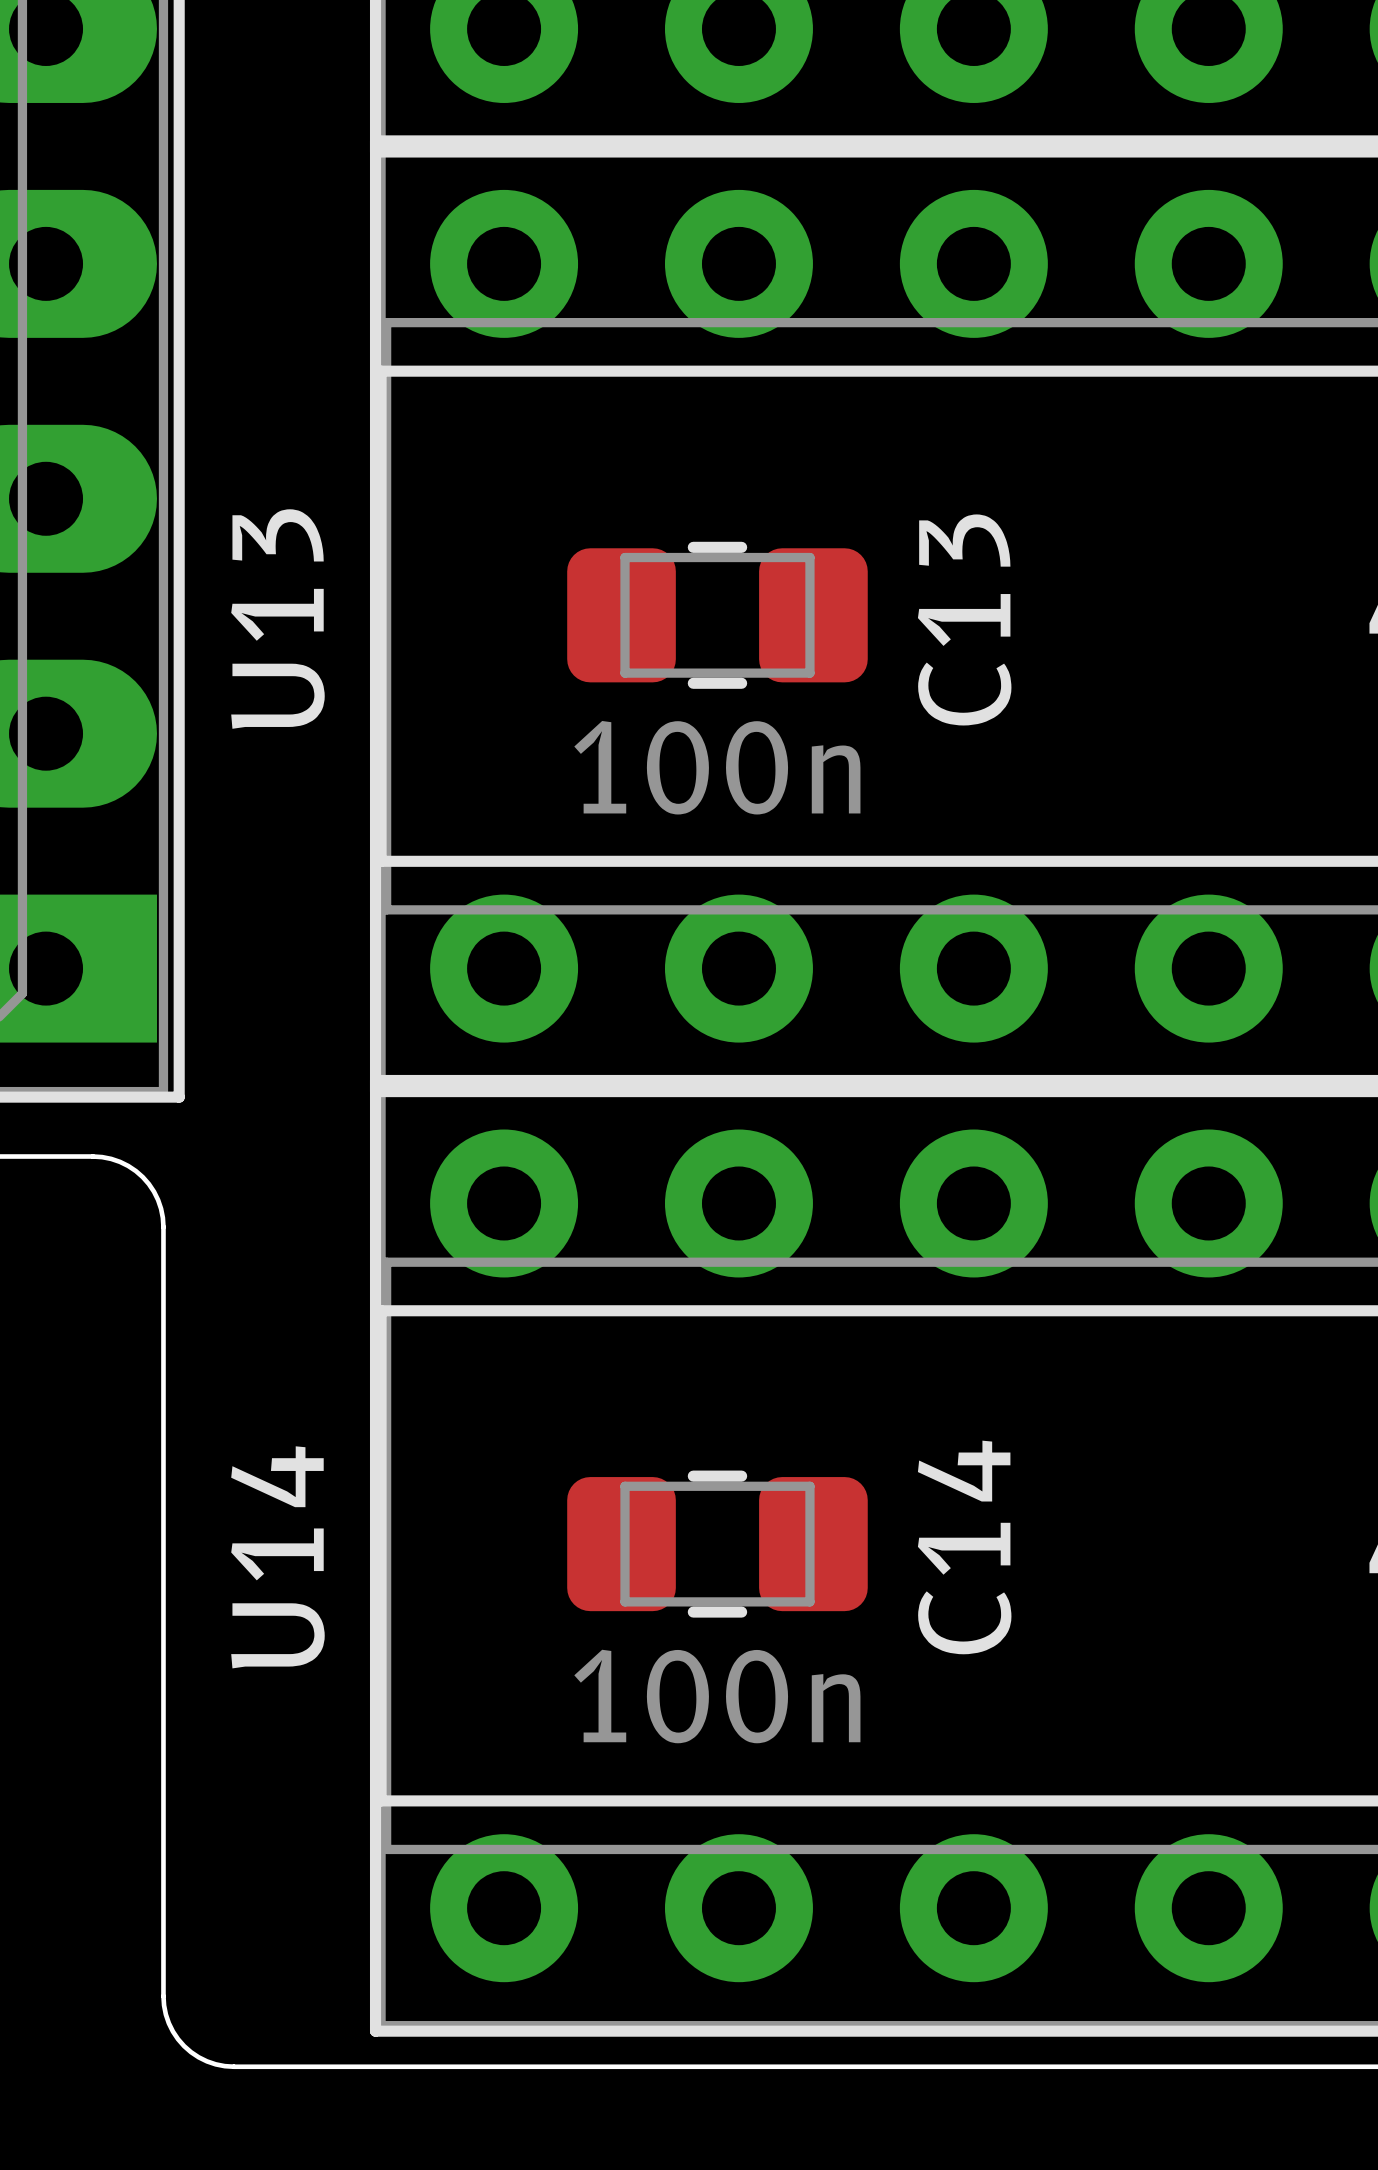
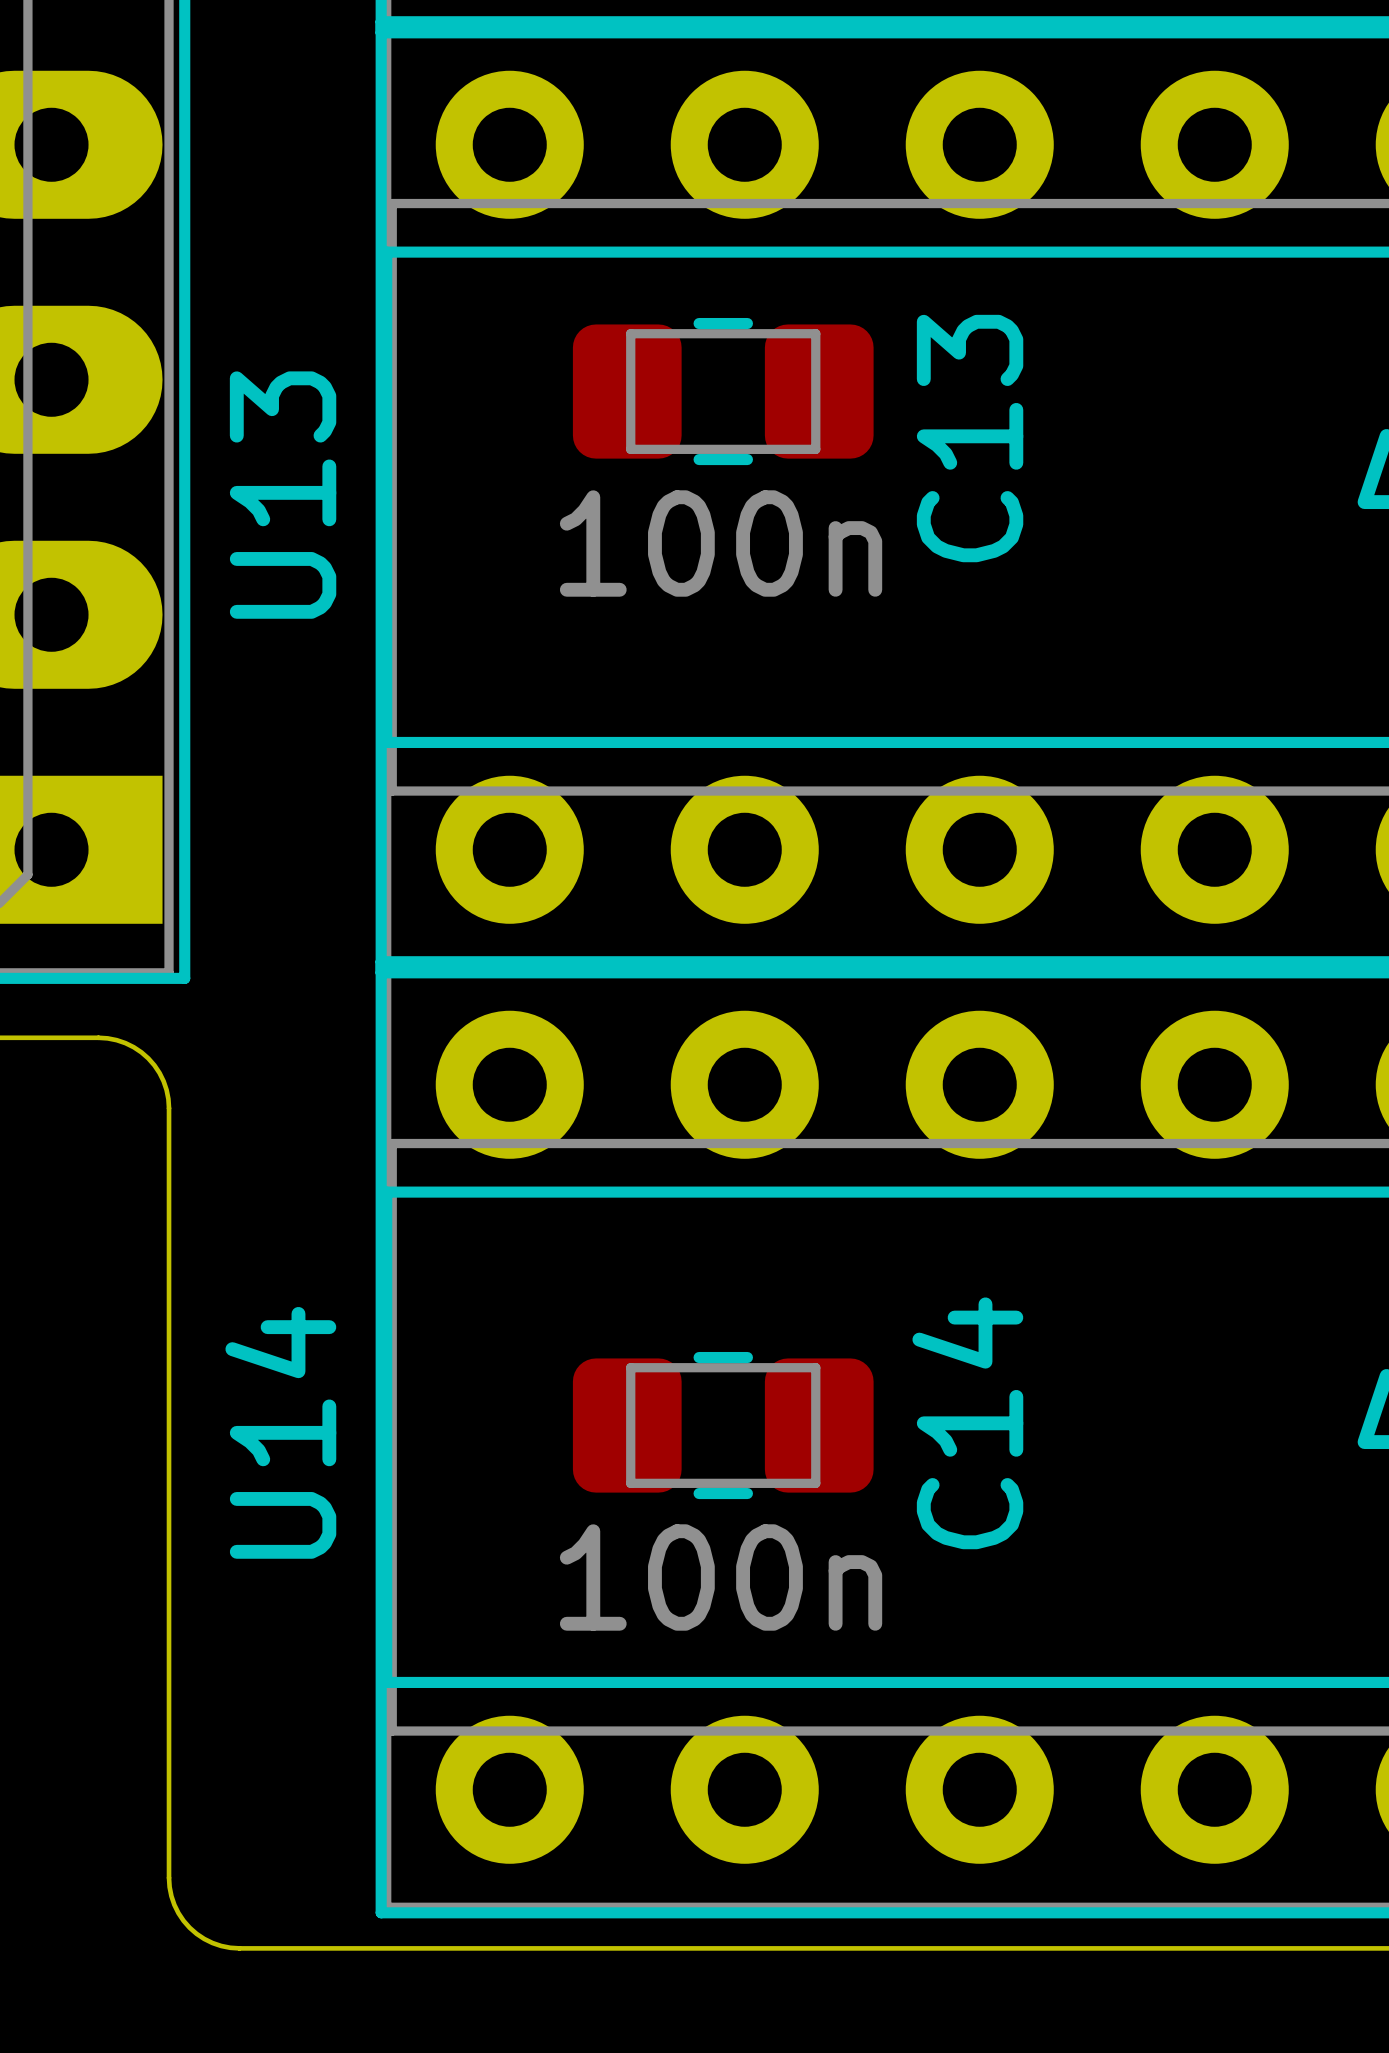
C13 position: (717, 615) -> (723, 391)
C13 name position: C13 (964, 619) -> C13 (970, 438)

